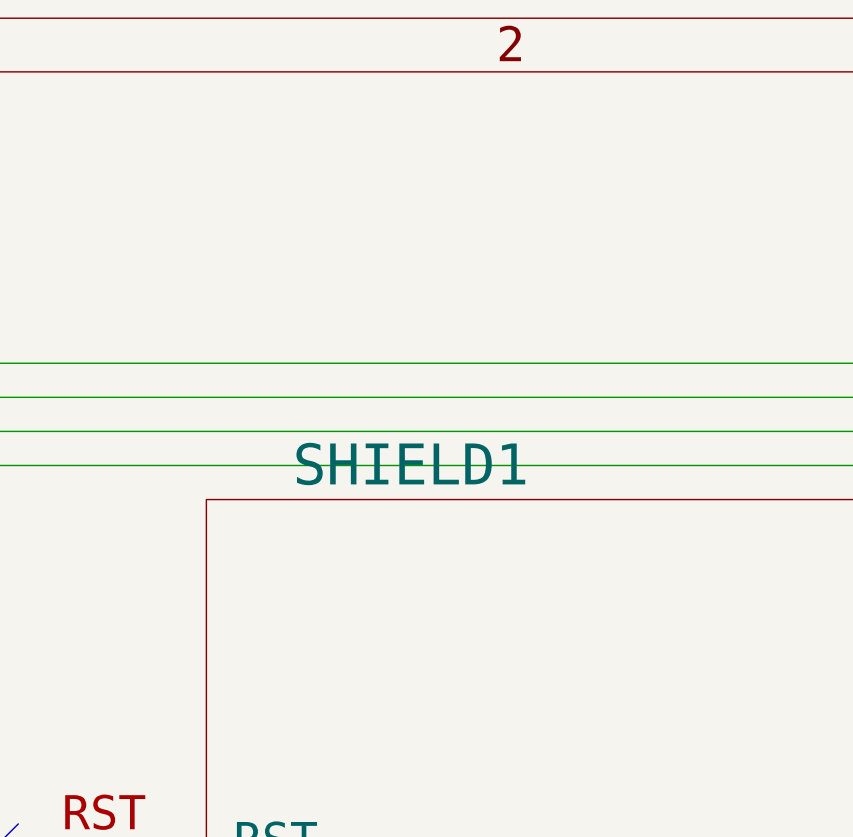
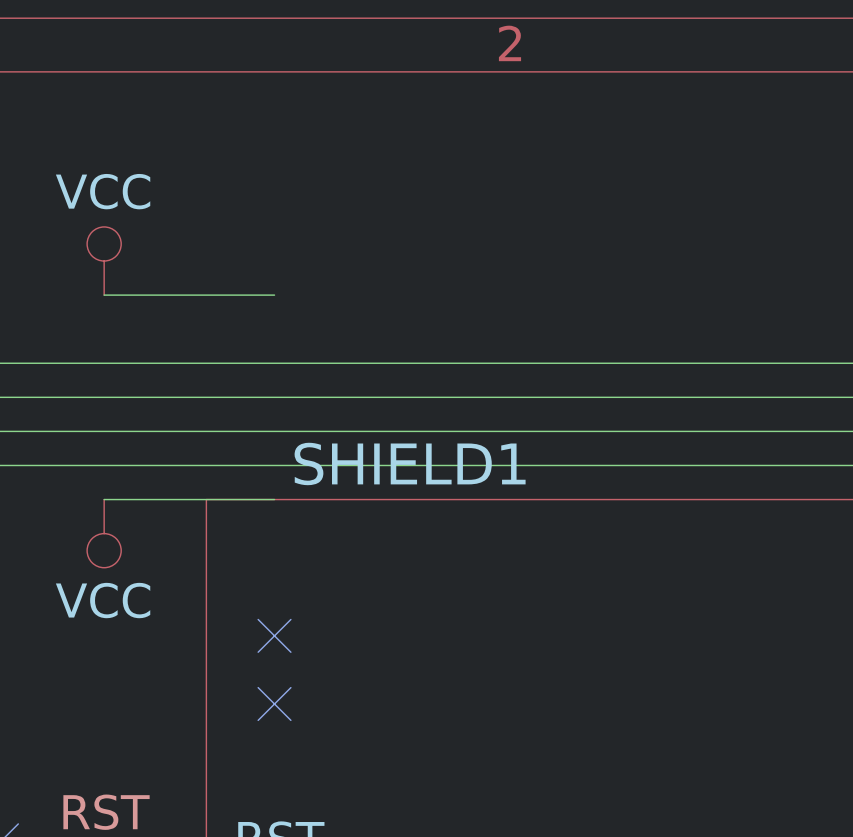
power symbol: none -> VCC (104, 261)
wire: none -> (104, 295) (274, 295)
wire: none -> (104, 499) (274, 499)
power symbol: none -> VCC (104, 533)
no-connect mark: none -> (274, 635)
no-connect mark: none -> (274, 704)

